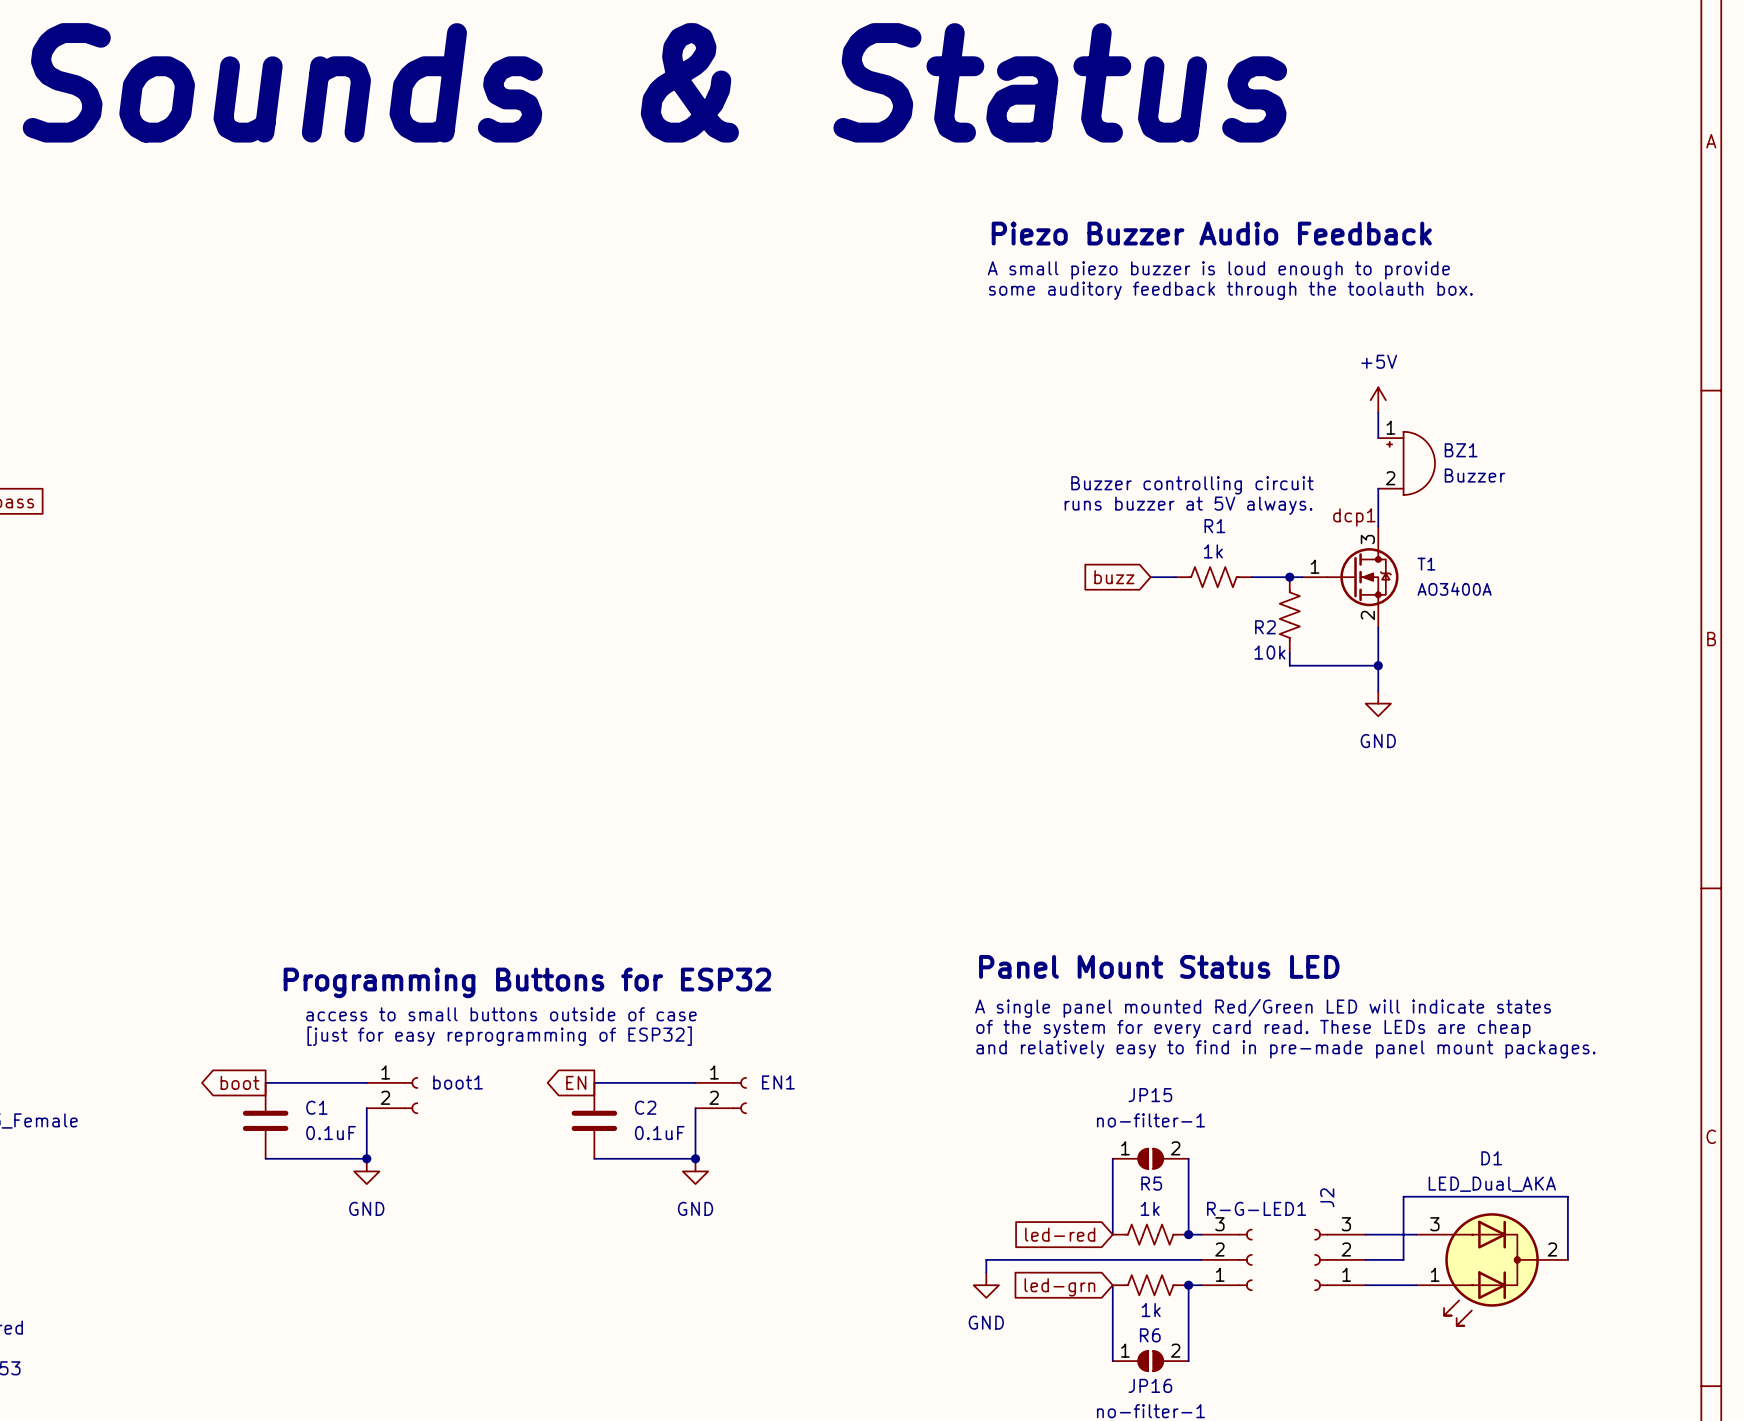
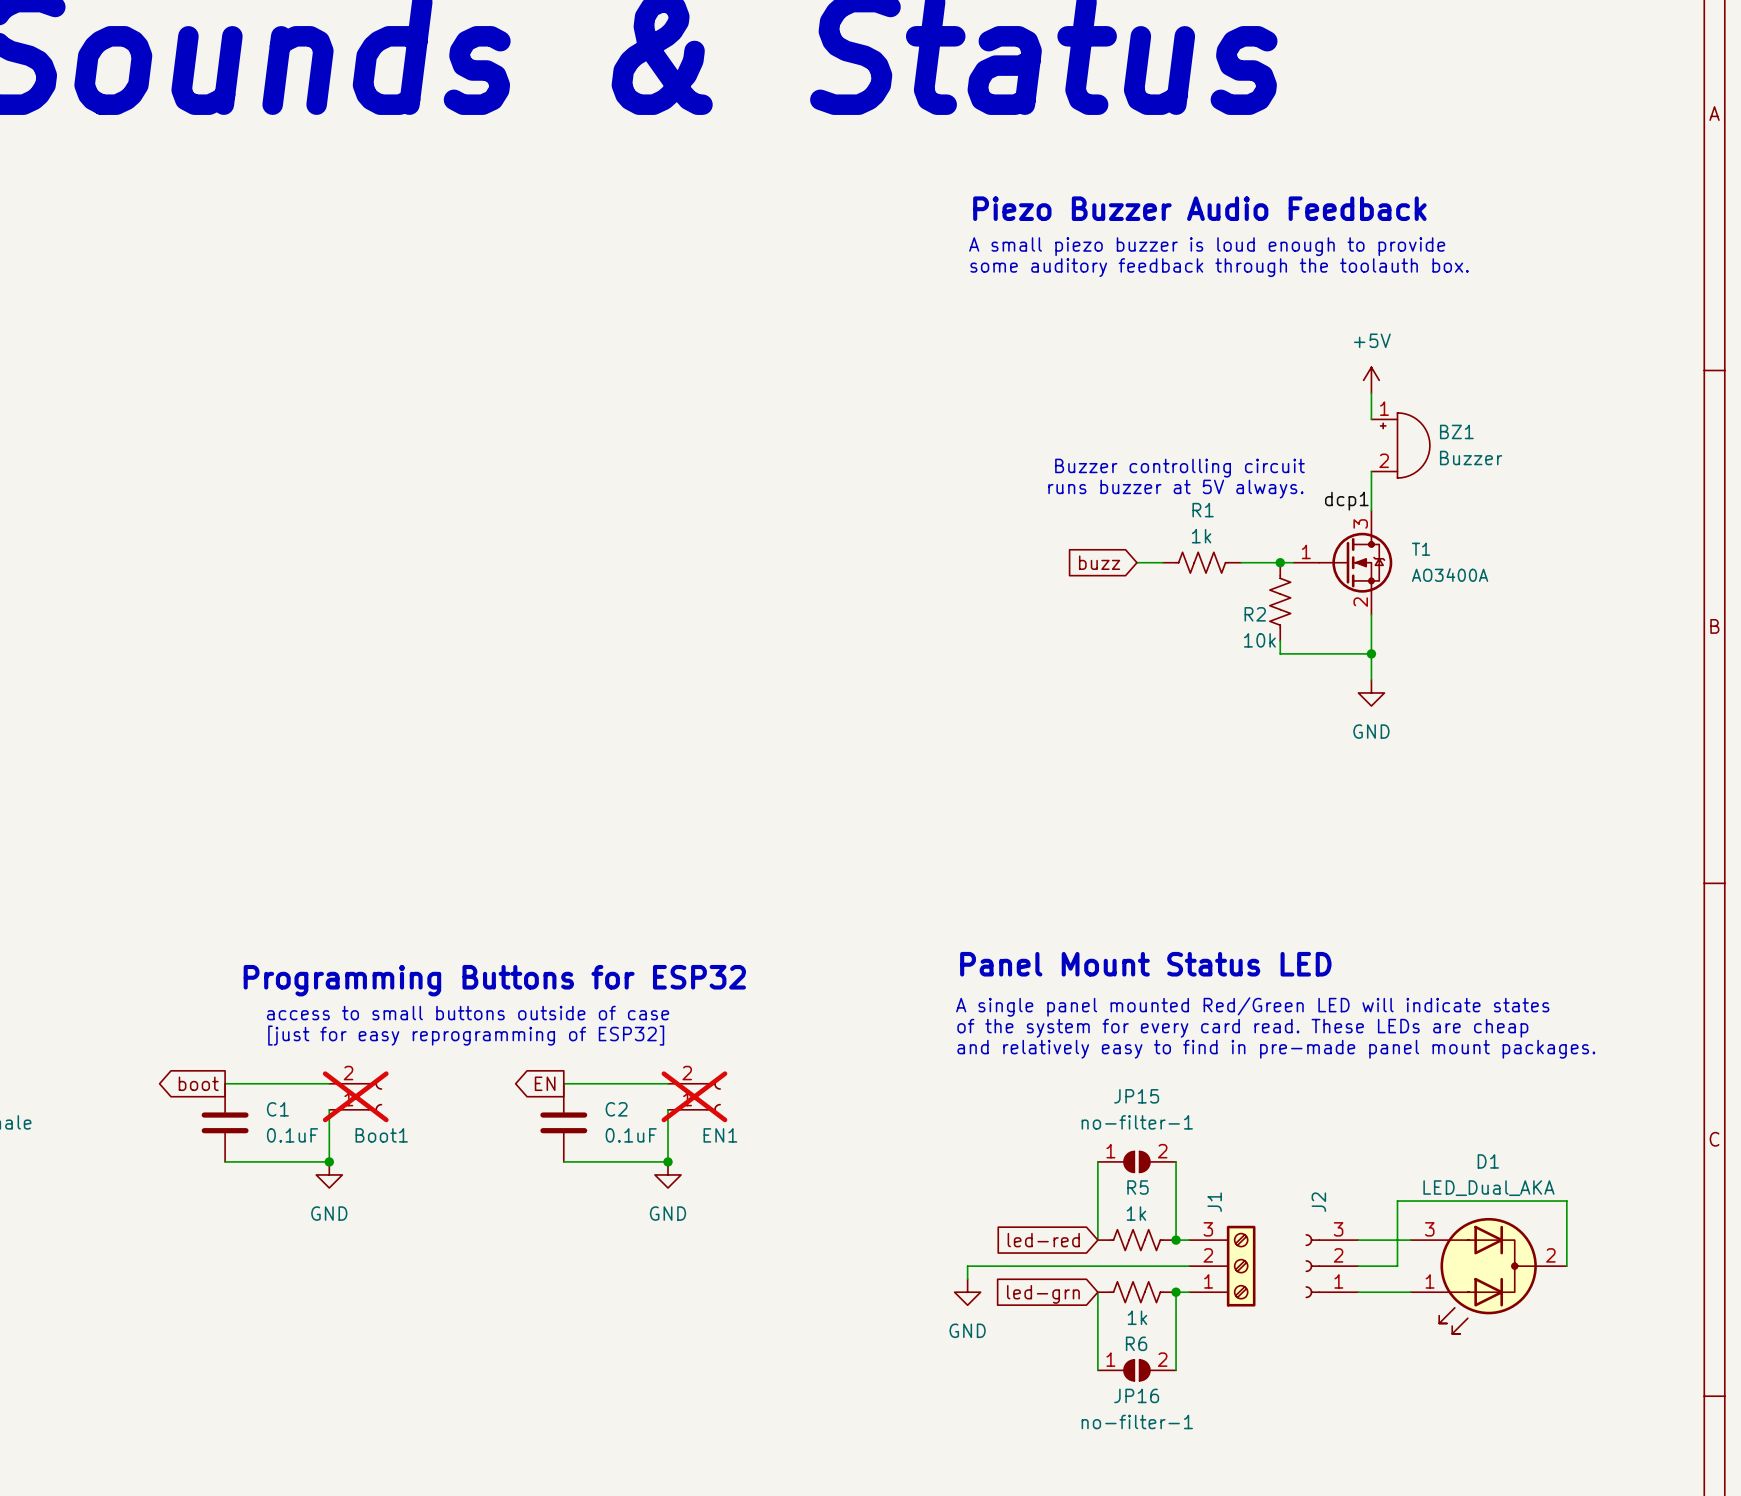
boot1 name: boot1 (458, 1082) -> Boot1 (381, 1135)
EN1 name position: EN1 (778, 1082) -> EN1 (720, 1135)
boot1 do-not-place cross: none -> (355, 1096)
boot1 flip: as is (411, 1095) -> up-down (374, 1096)
EN1 do-not-place cross: none -> (694, 1096)
EN1 flip: as is (739, 1095) -> up-down (713, 1096)
R-G-LED1: (1226, 1259) -> none
J1: none -> (1222, 1266)

